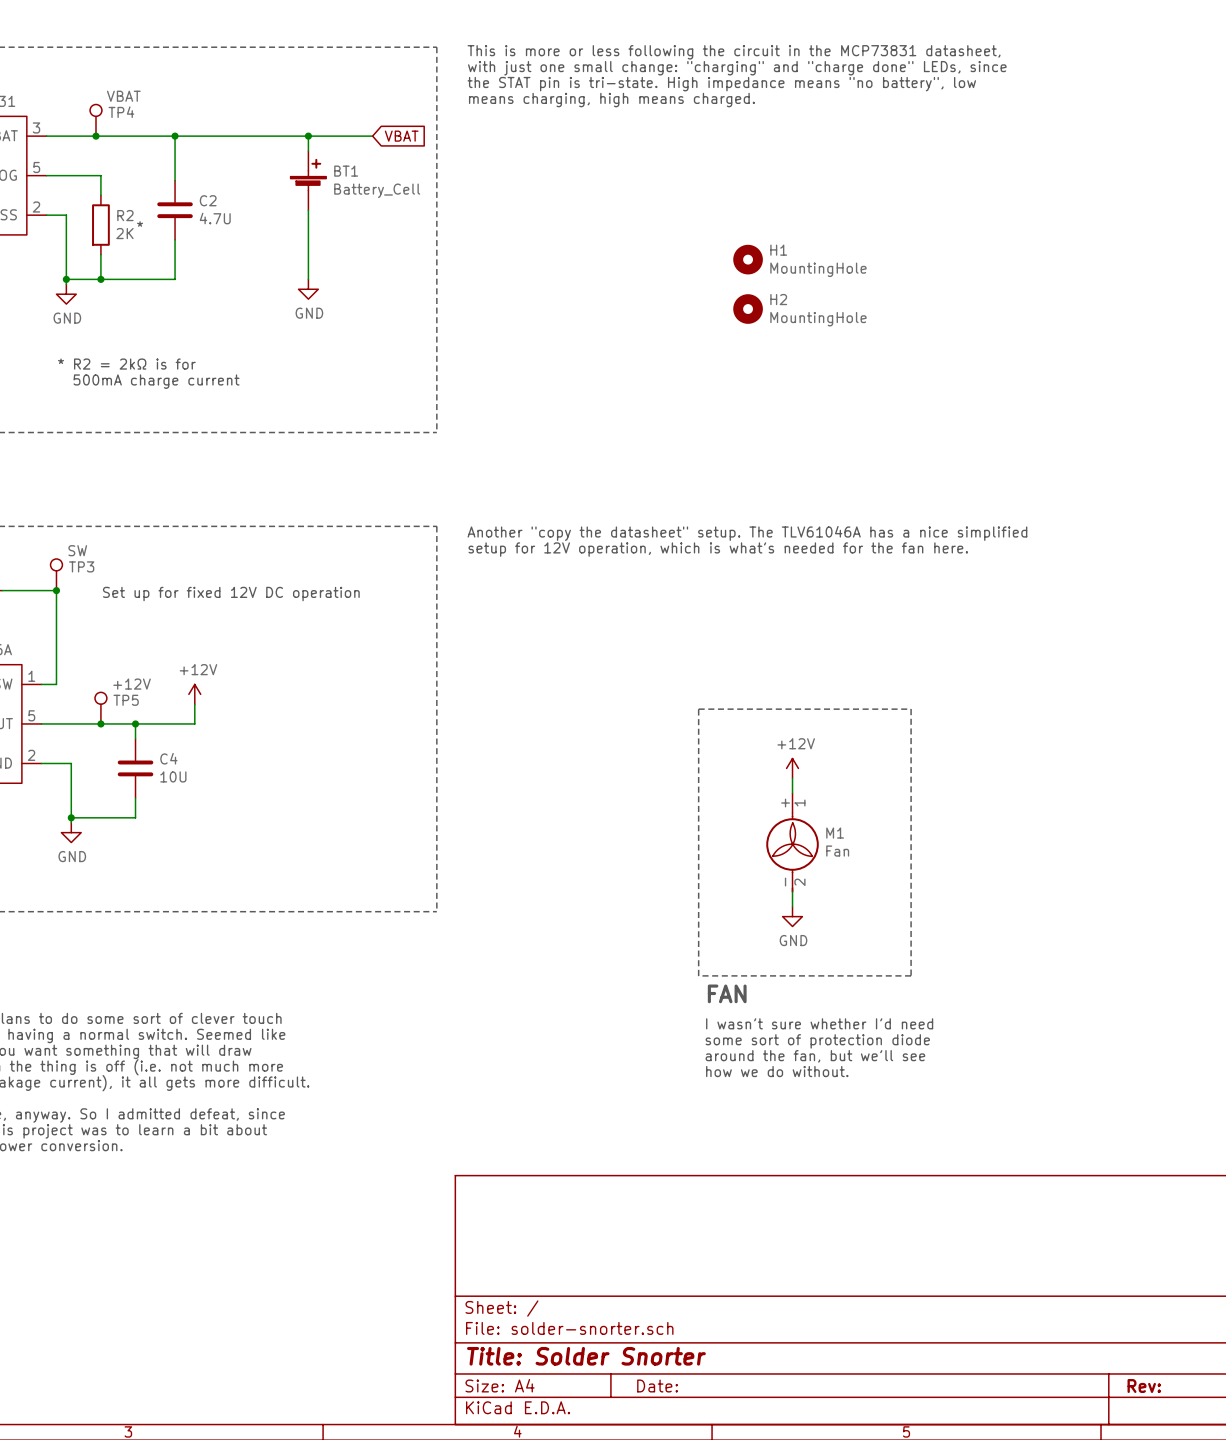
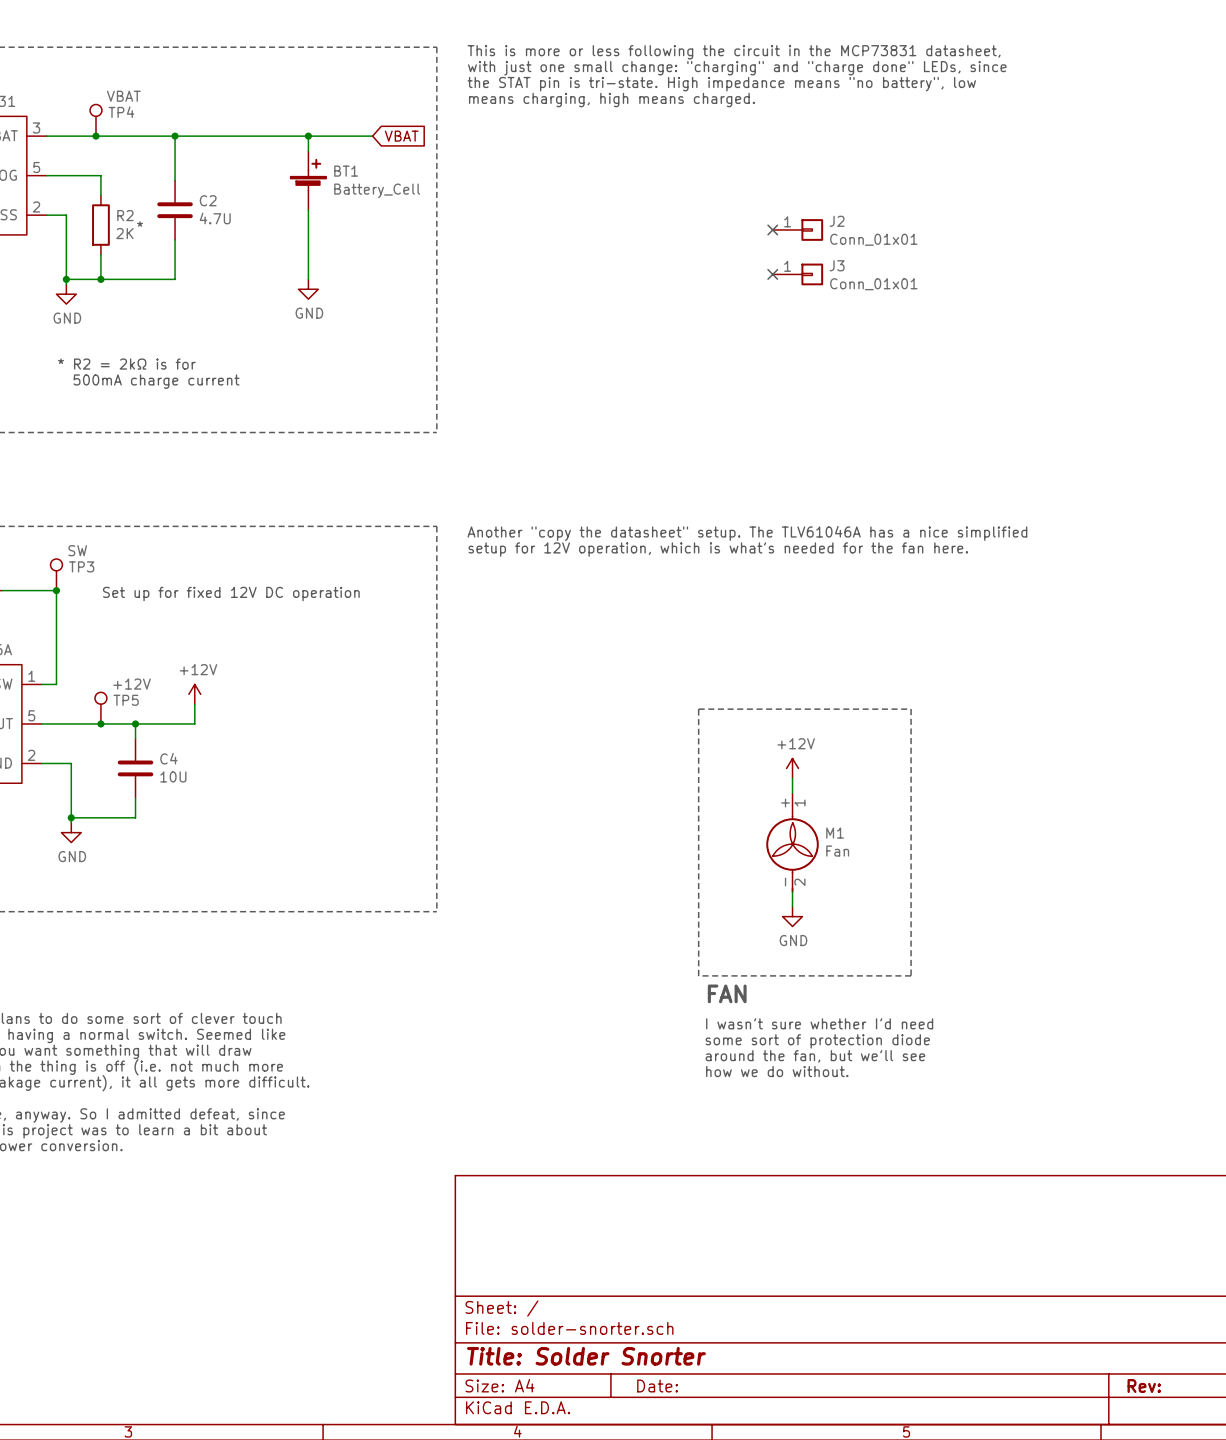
no-connect mark: none -> (772, 229)
J2: none -> Conn_01x01 (797, 229)
H1: MountingHole (748, 259) -> none
no-connect mark: none -> (772, 274)
J3: none -> Conn_01x01 (797, 274)
H2: MountingHole (748, 309) -> none

